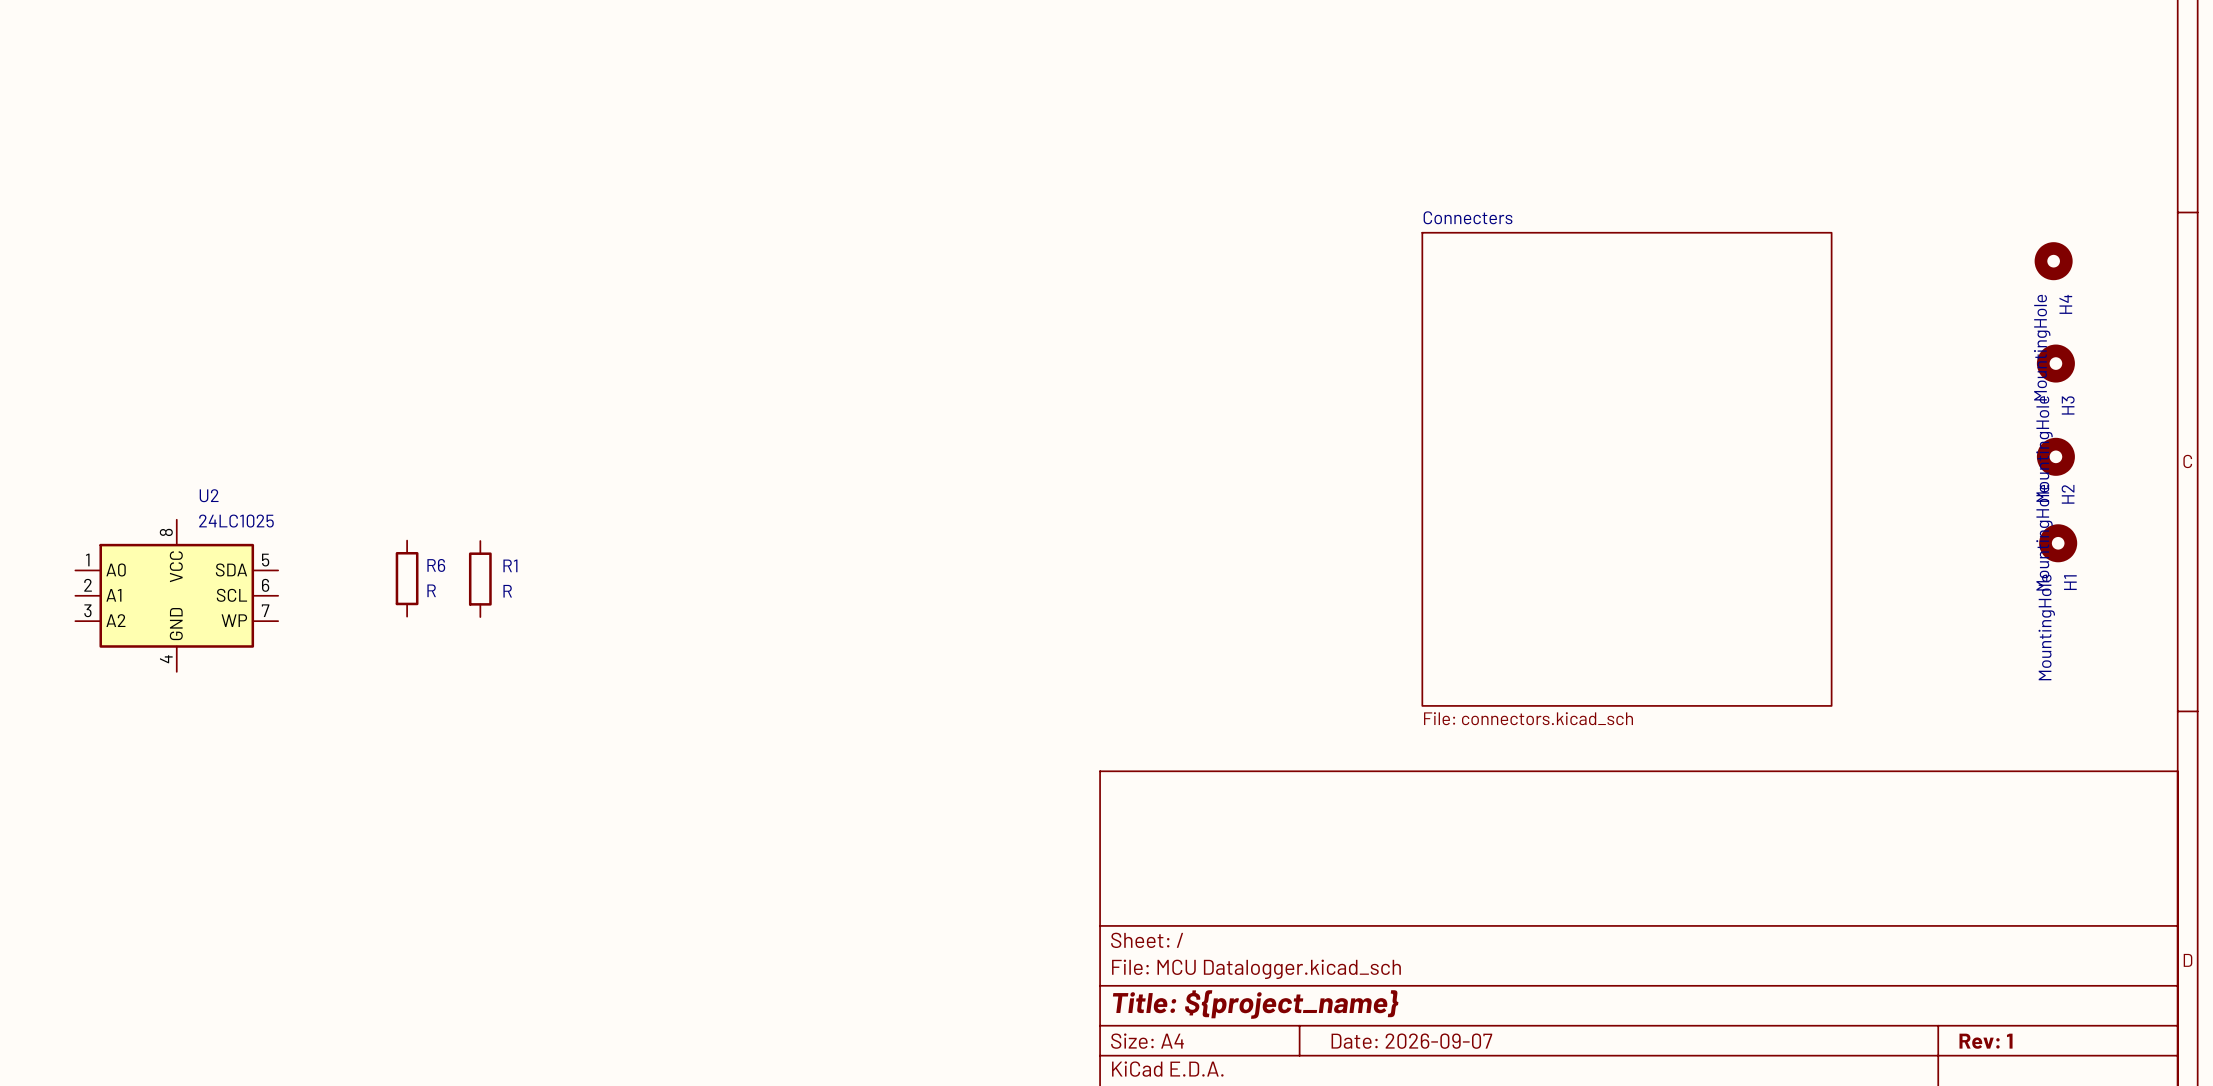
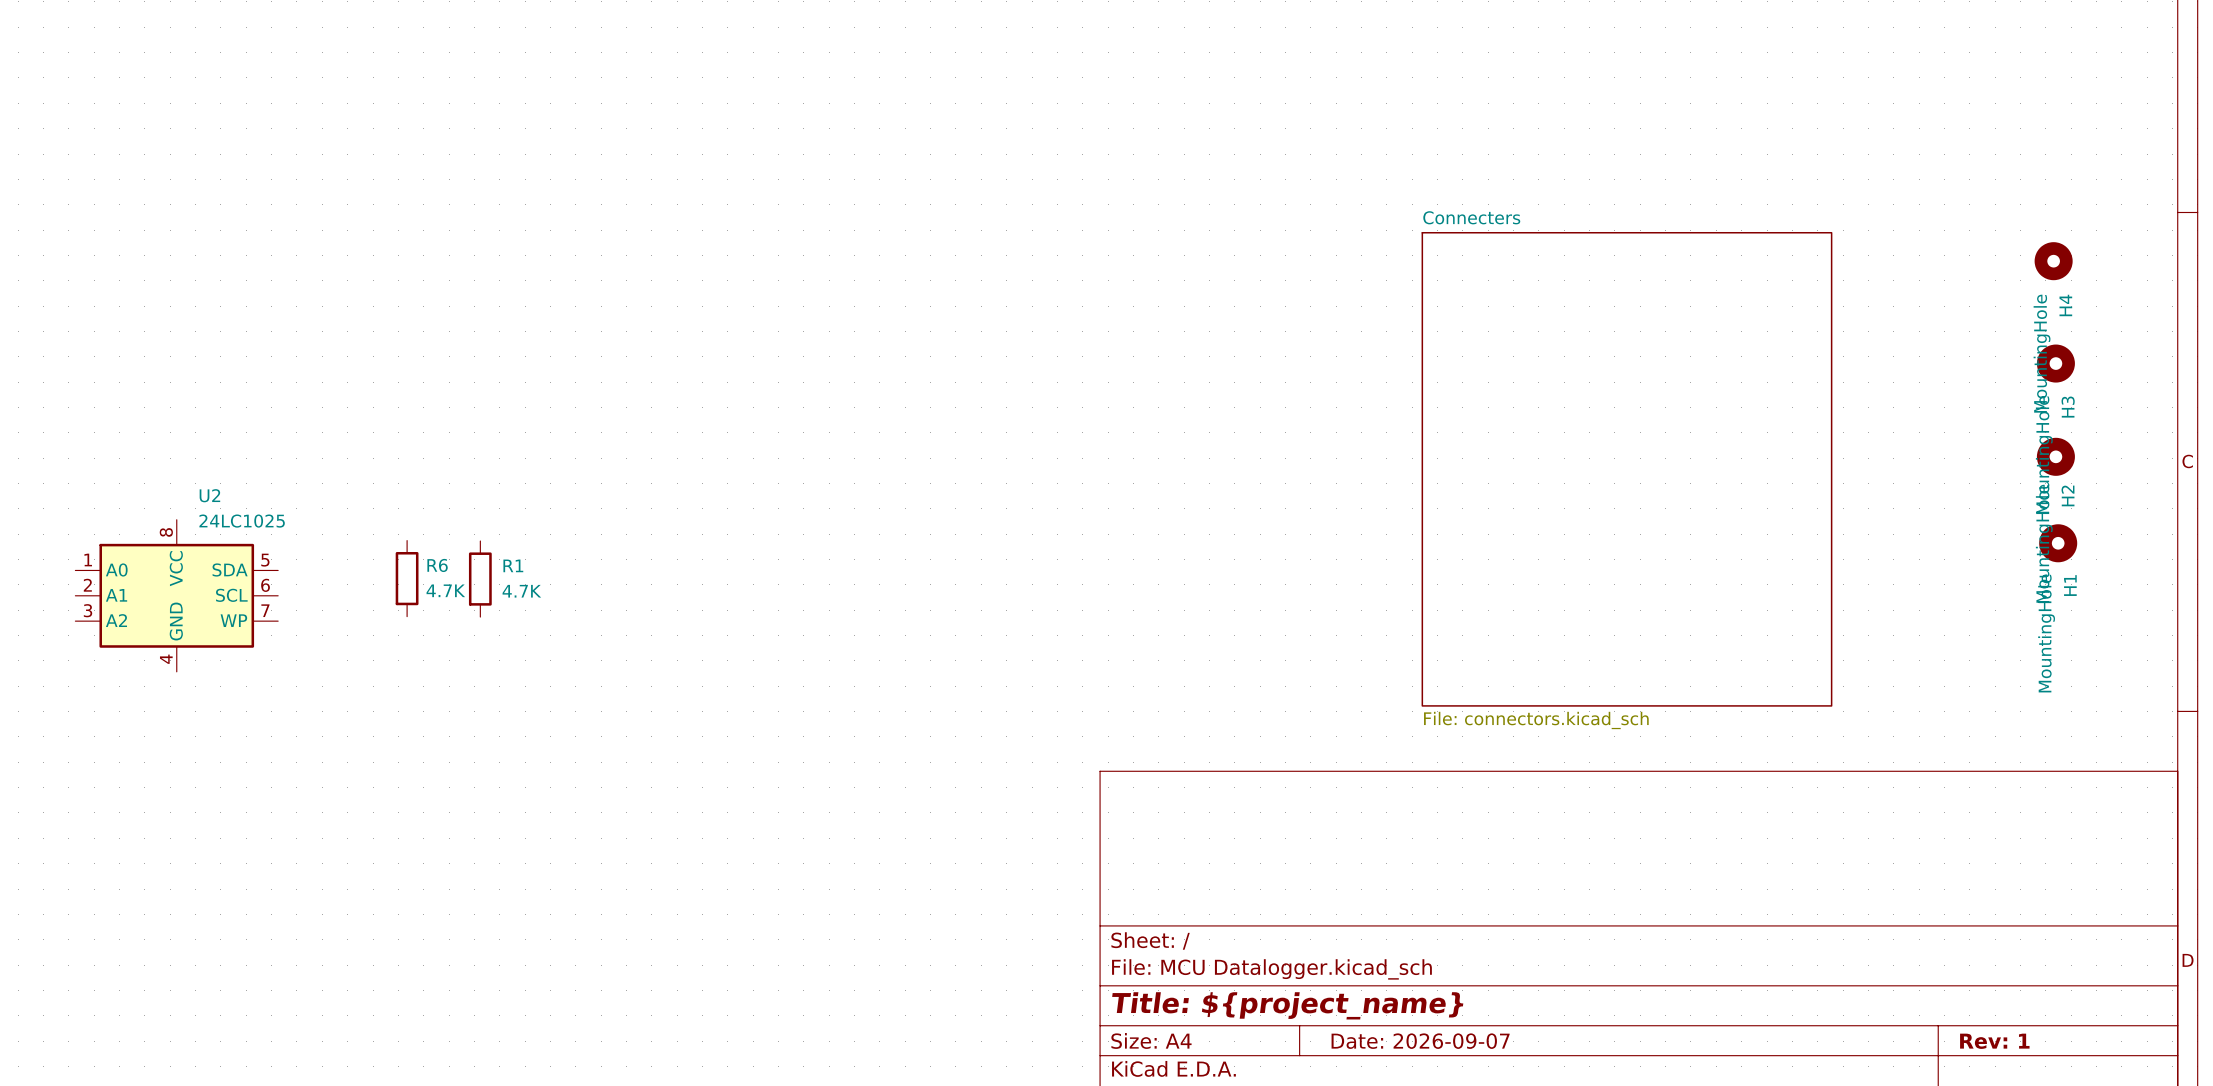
R6 value: R (431, 590) -> 4.7K (445, 590)
R1 value: R (507, 591) -> 4.7K (521, 591)

